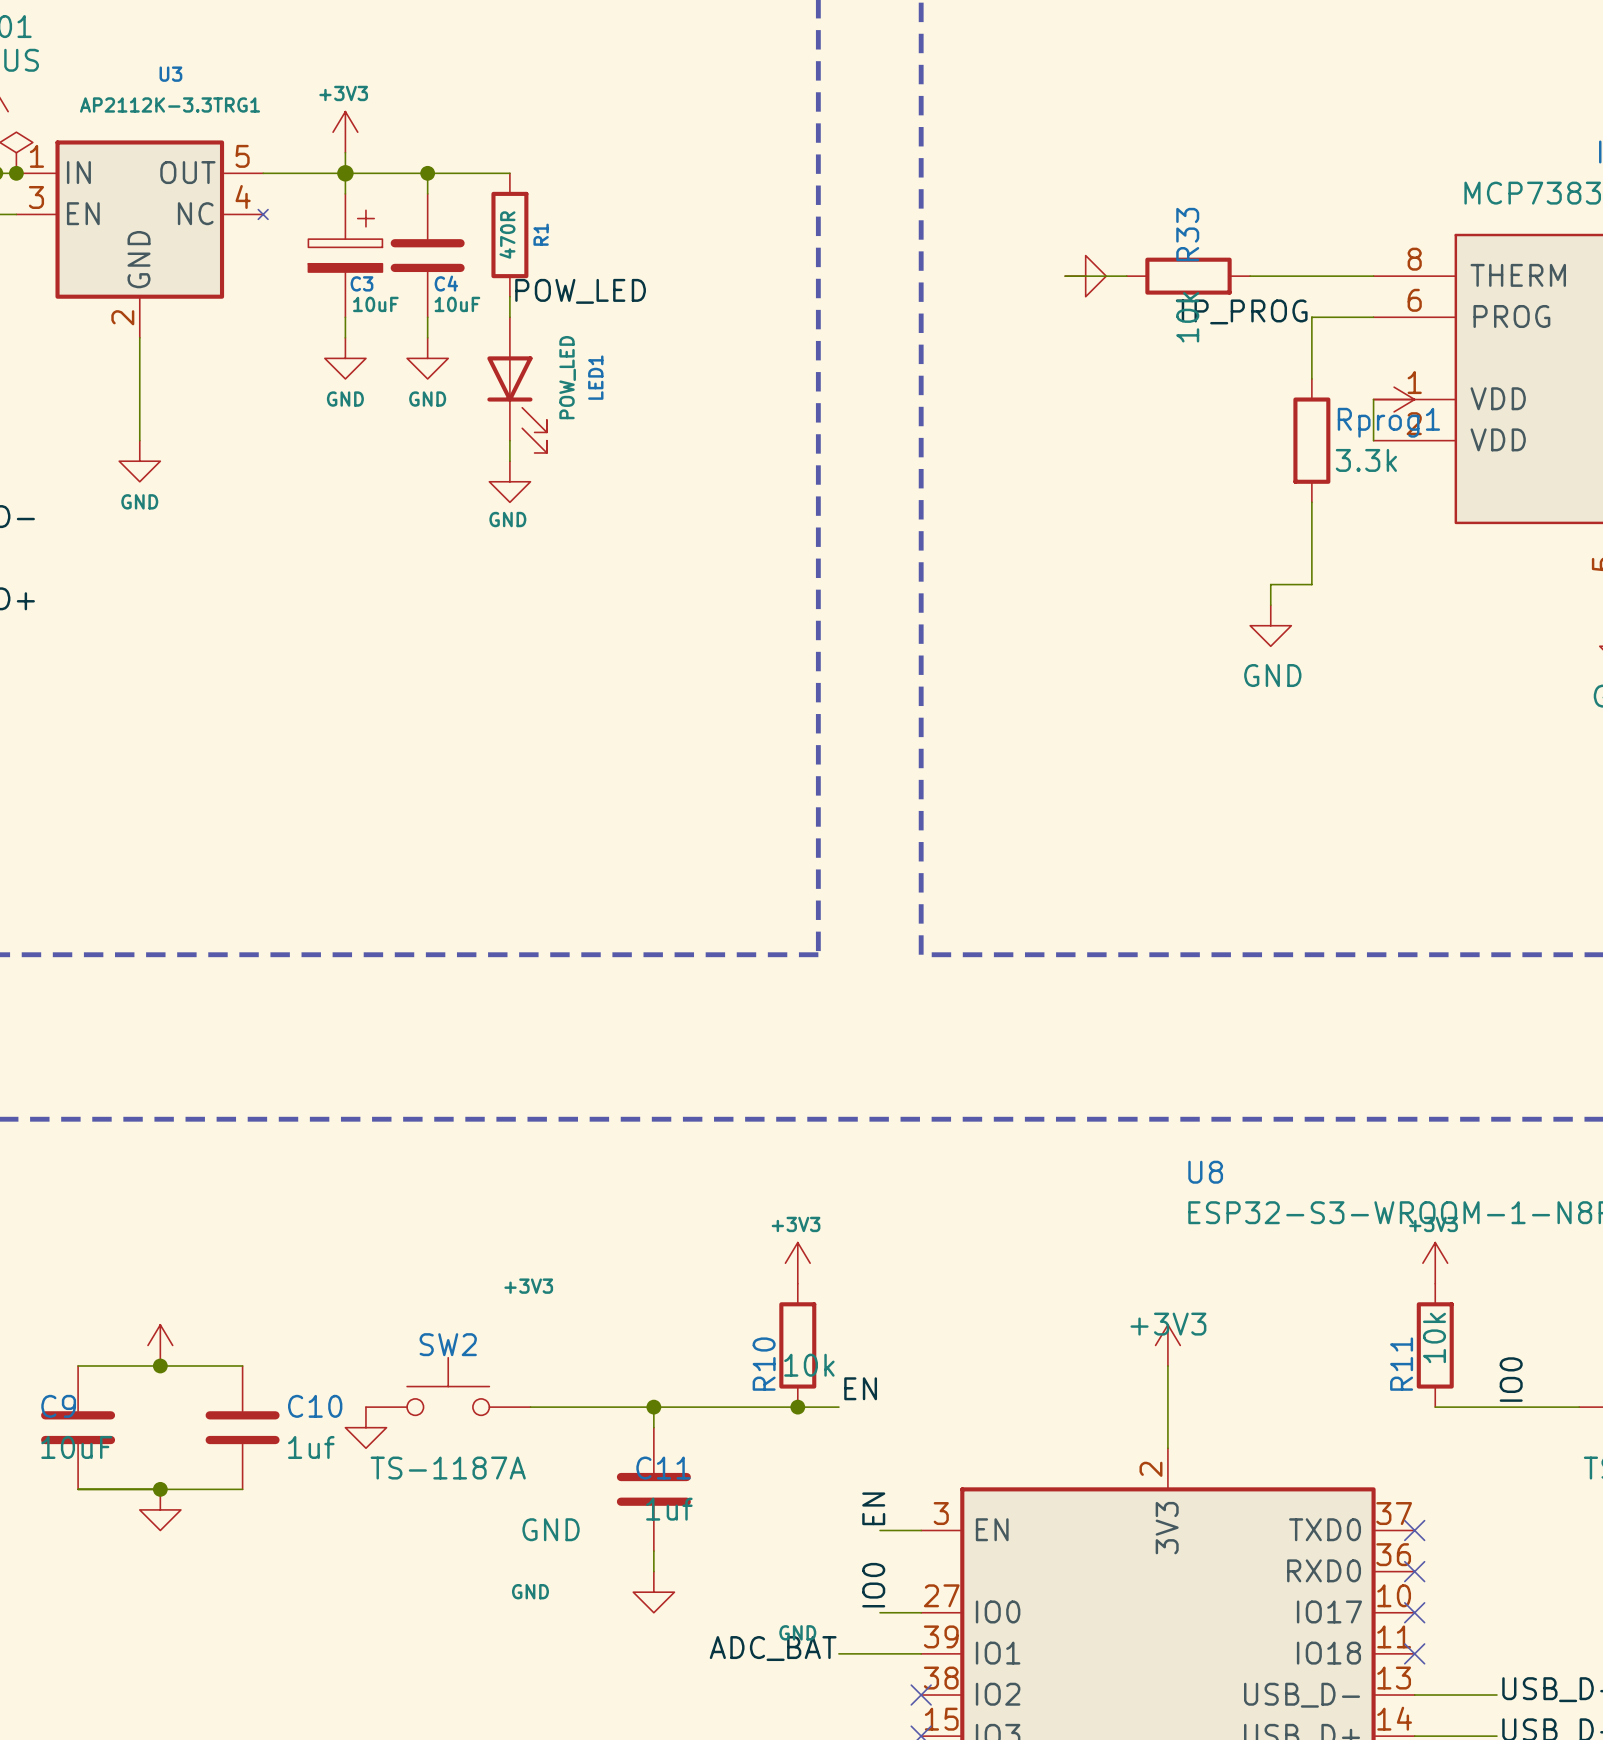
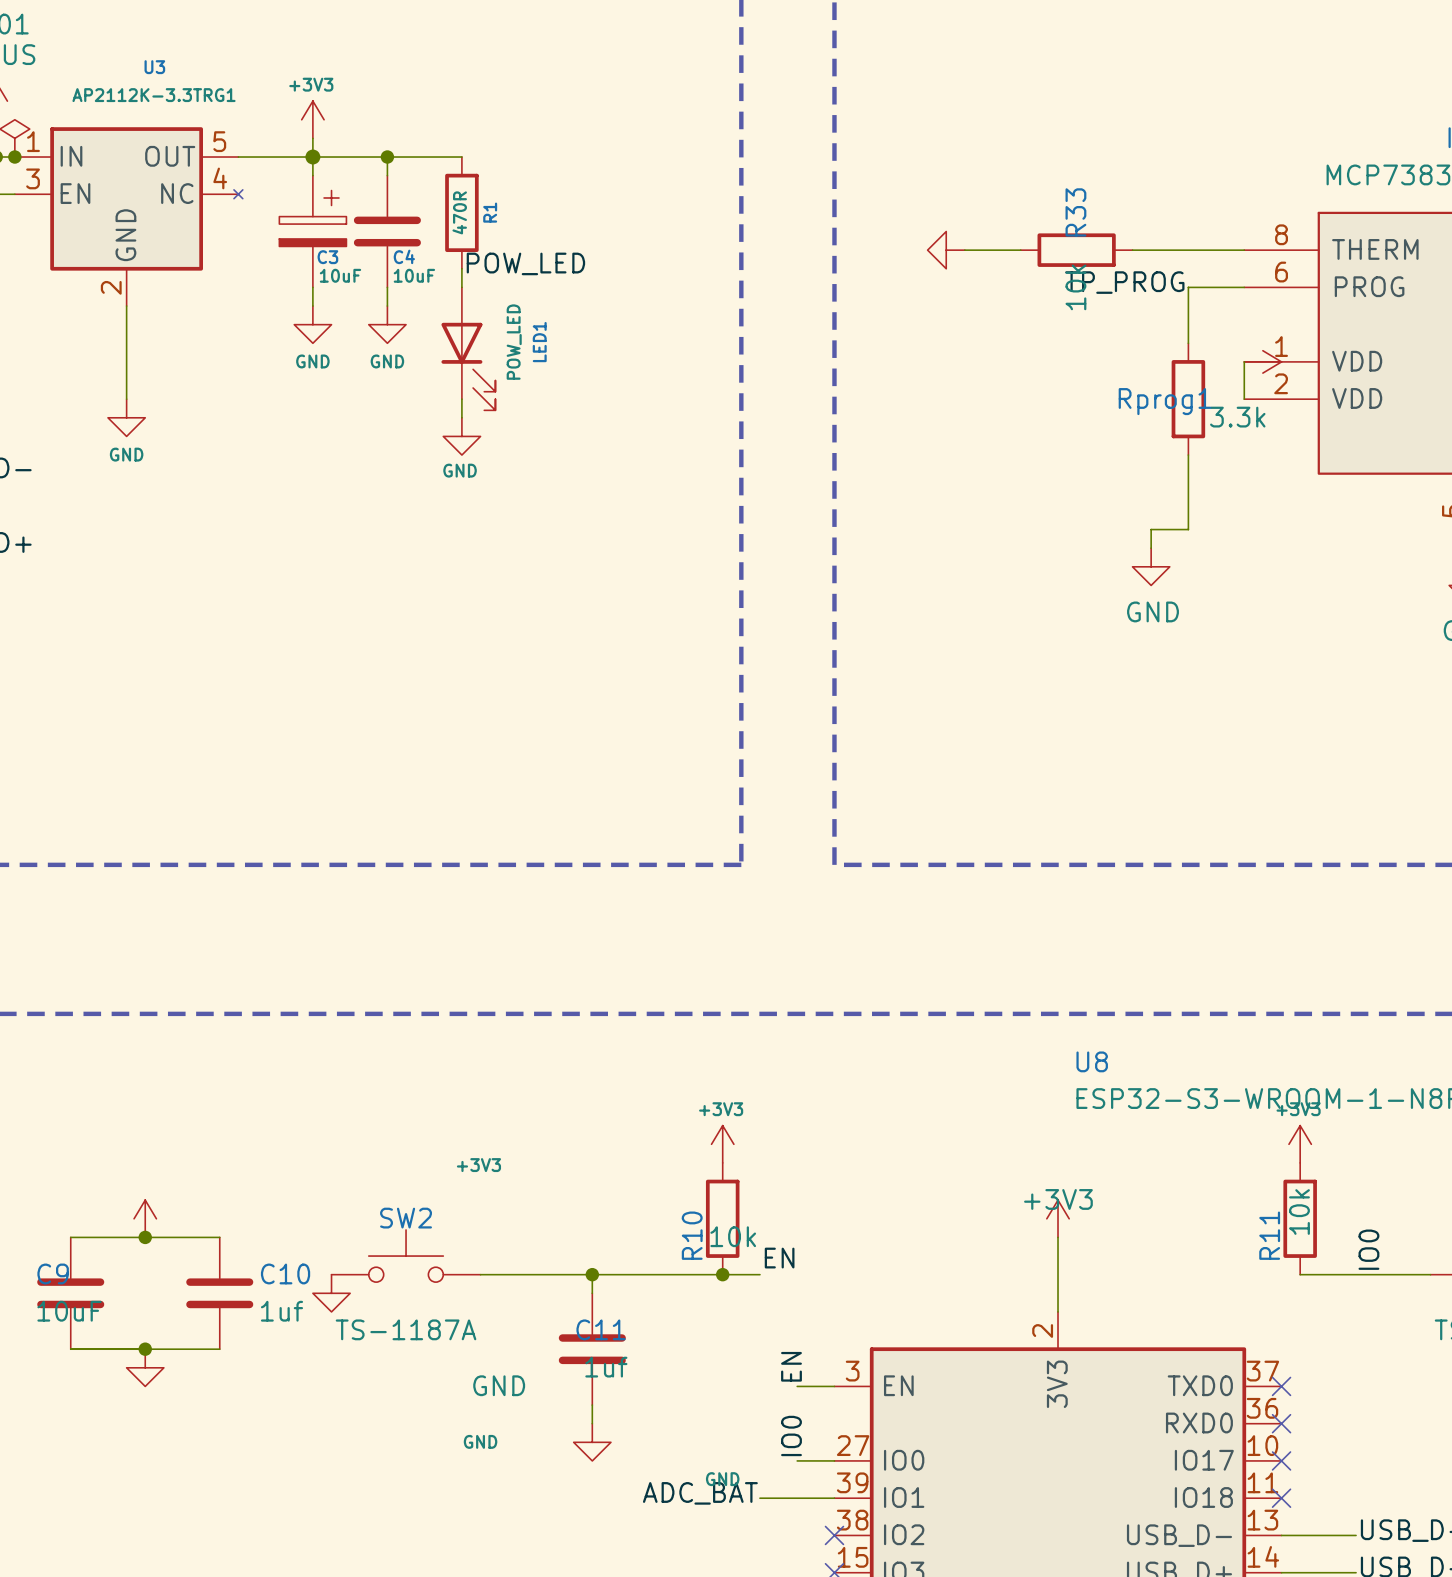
power symbol rotation: 0° (1085, 276) -> 180° (946, 250)
power symbol position: (1085, 276) -> (946, 250)
Rprog1 name position: Rprog1 (1388, 422) -> Rprog1 (1165, 401)

